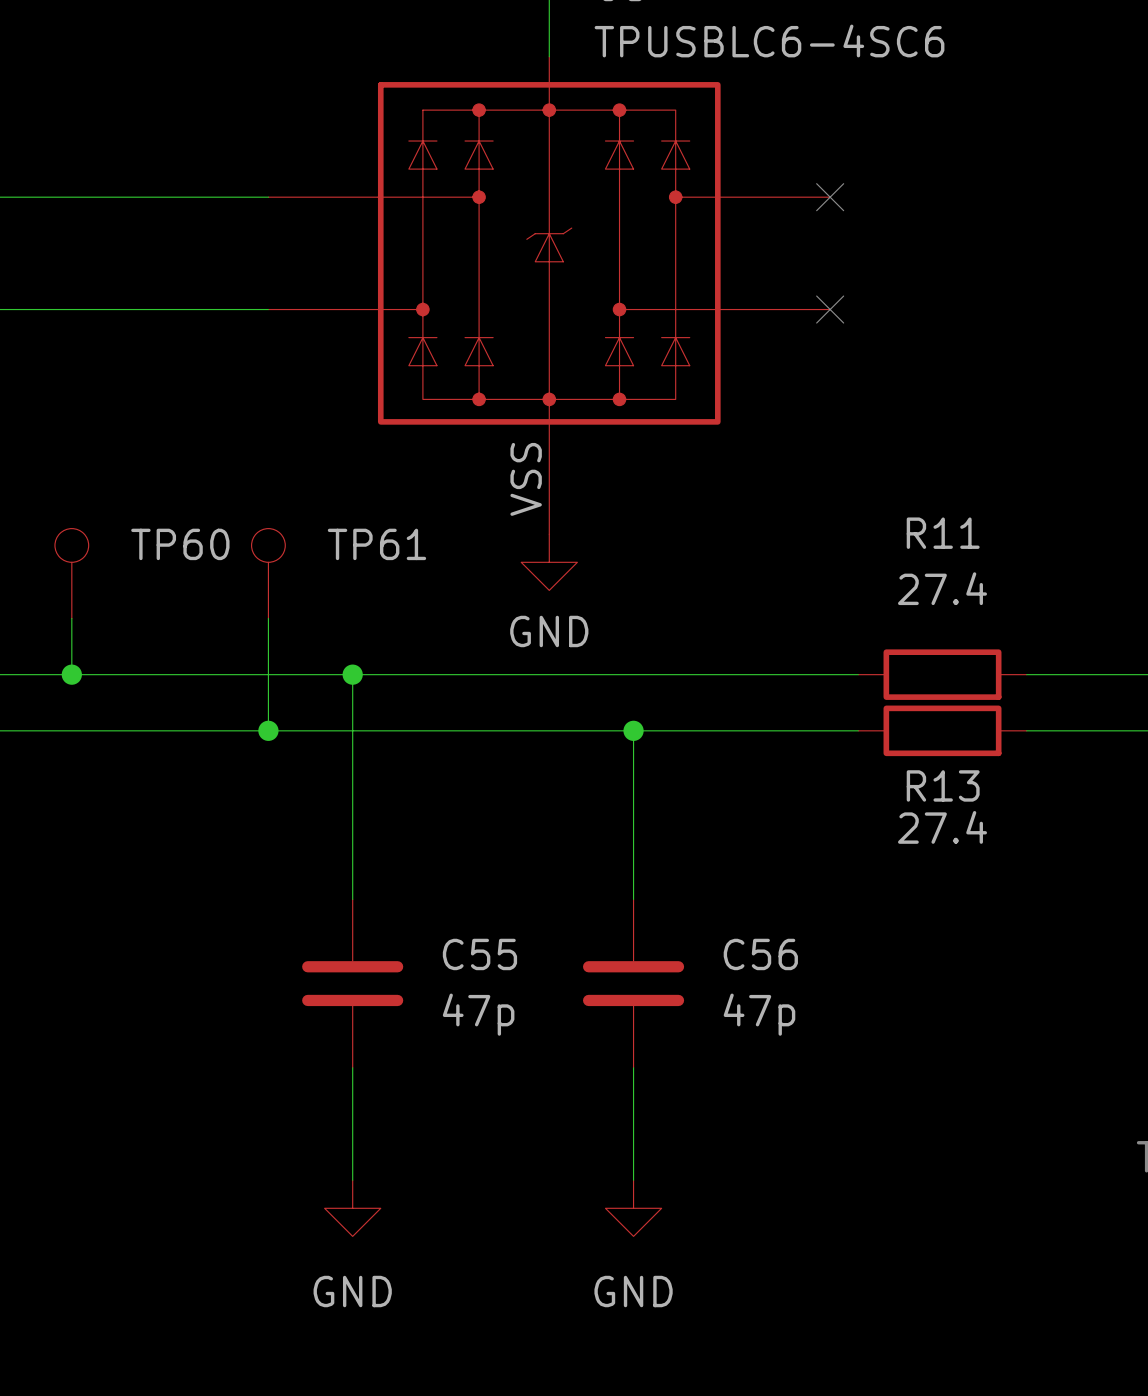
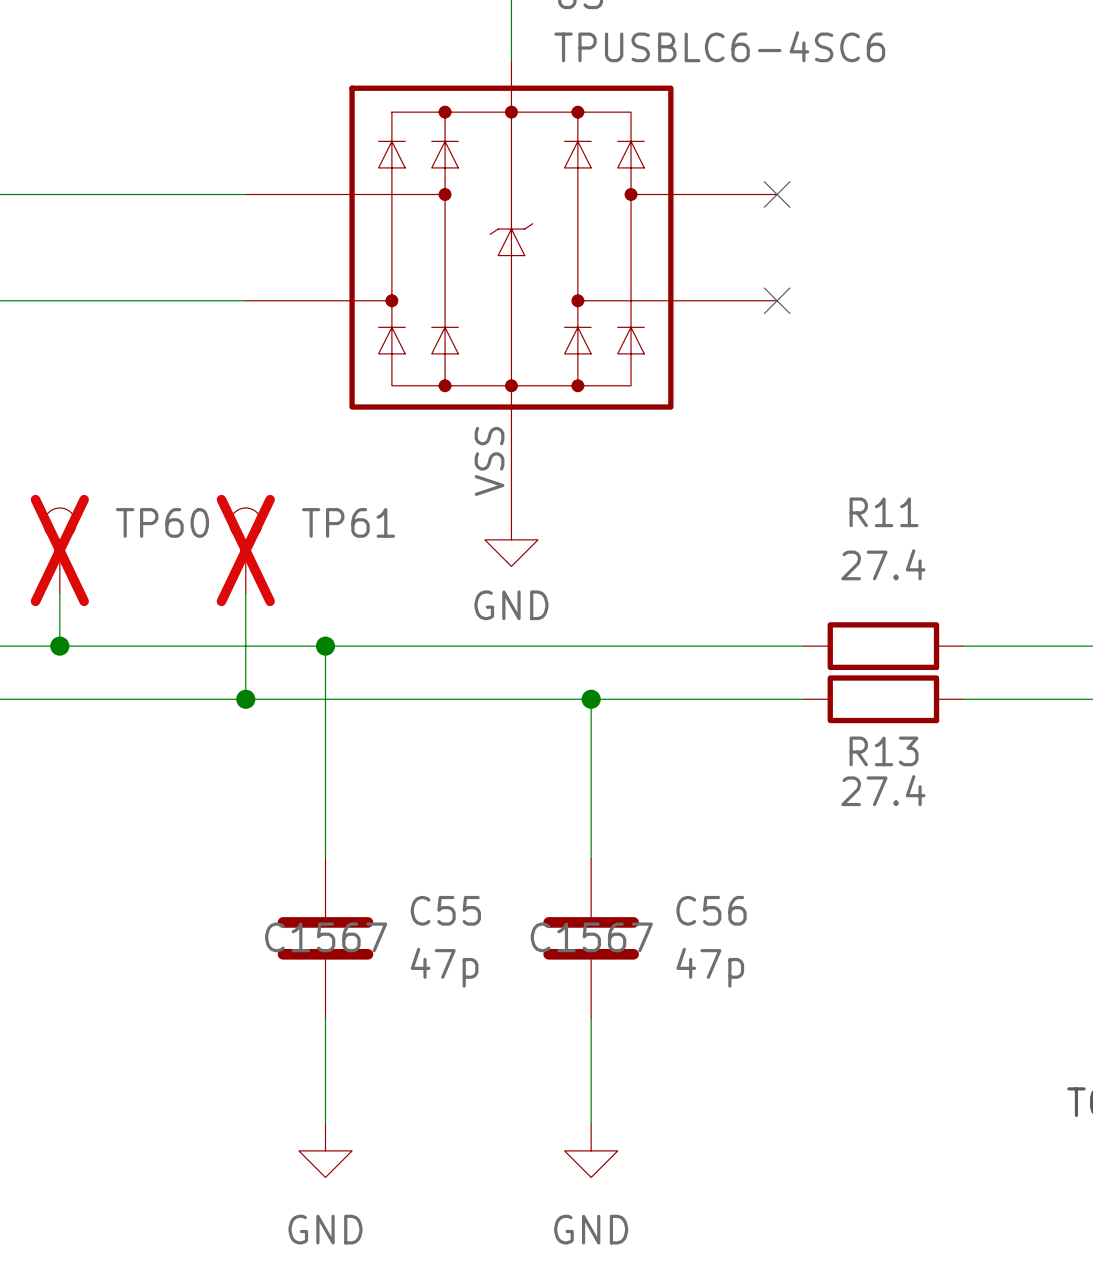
TP60 do-not-place cross: none -> (59, 550)
TP61 do-not-place cross: none -> (245, 550)
C55 text: none -> C1567 (326, 937)
C56 text: none -> C1567 (591, 937)

